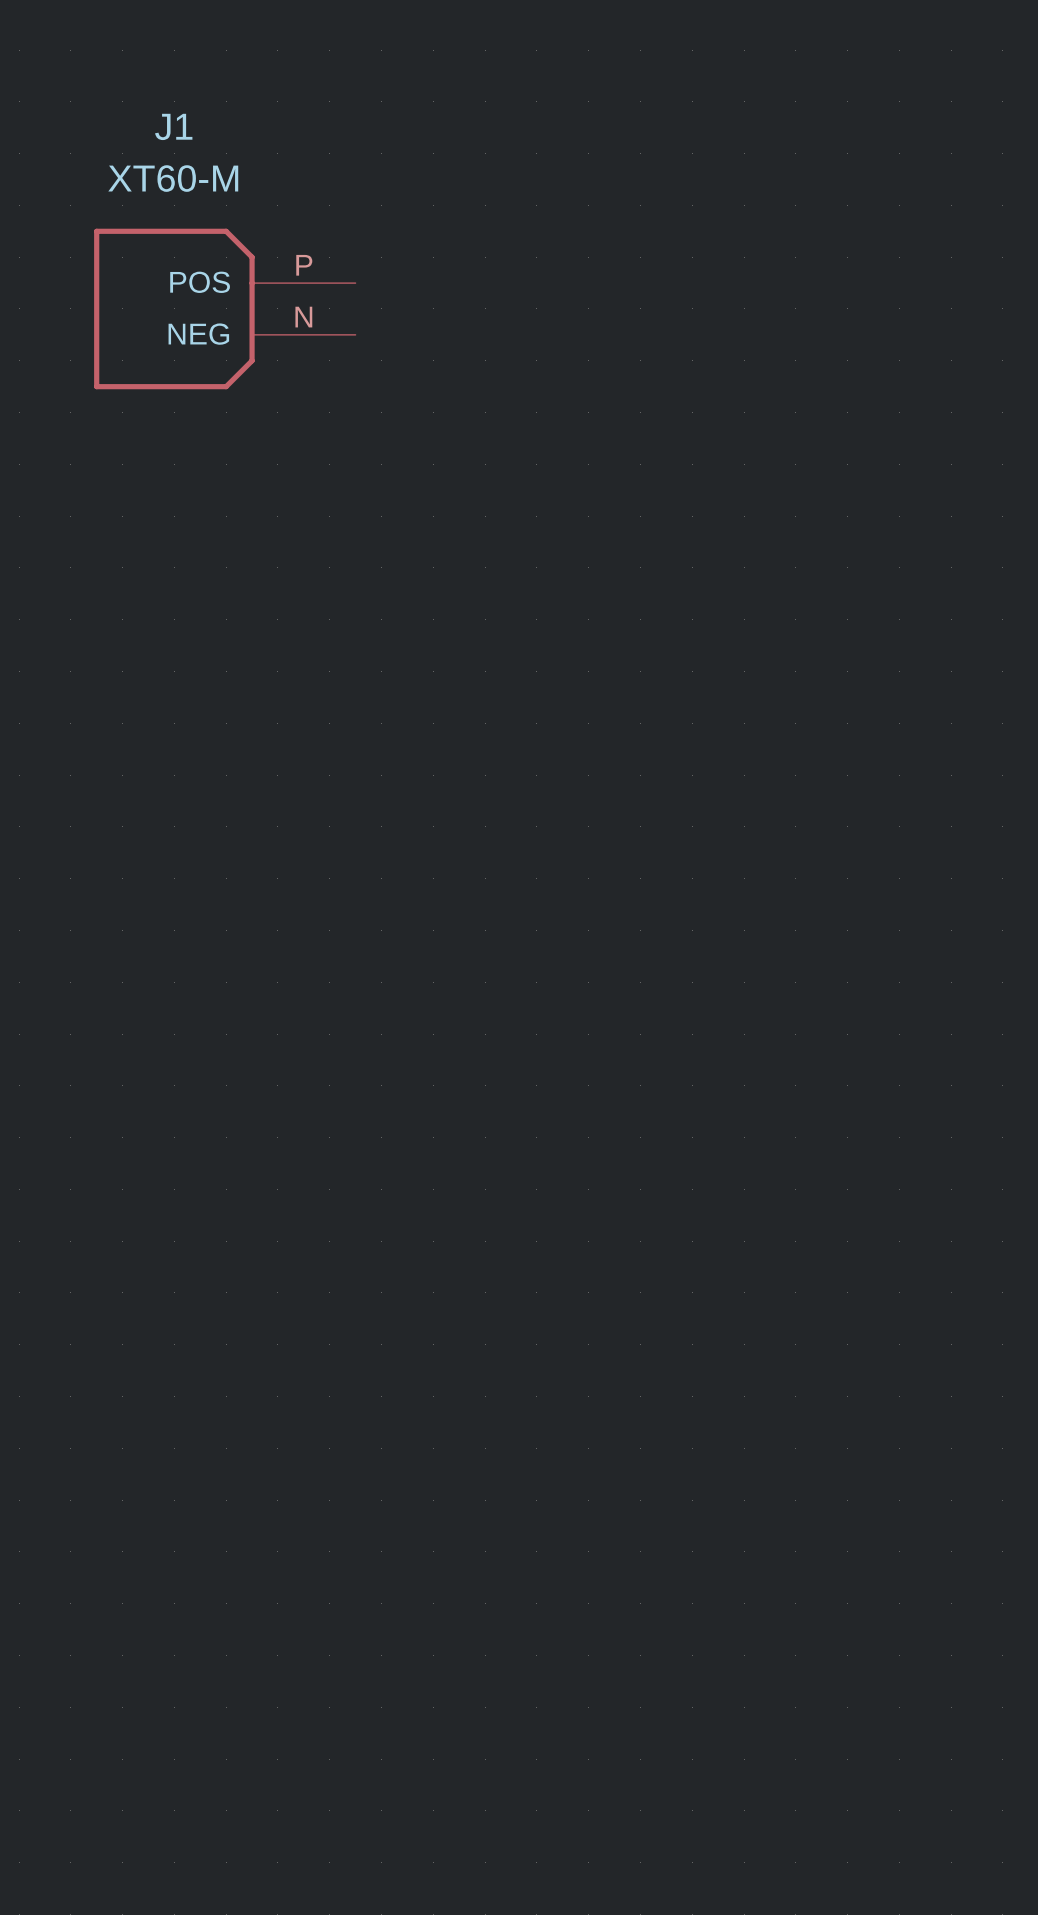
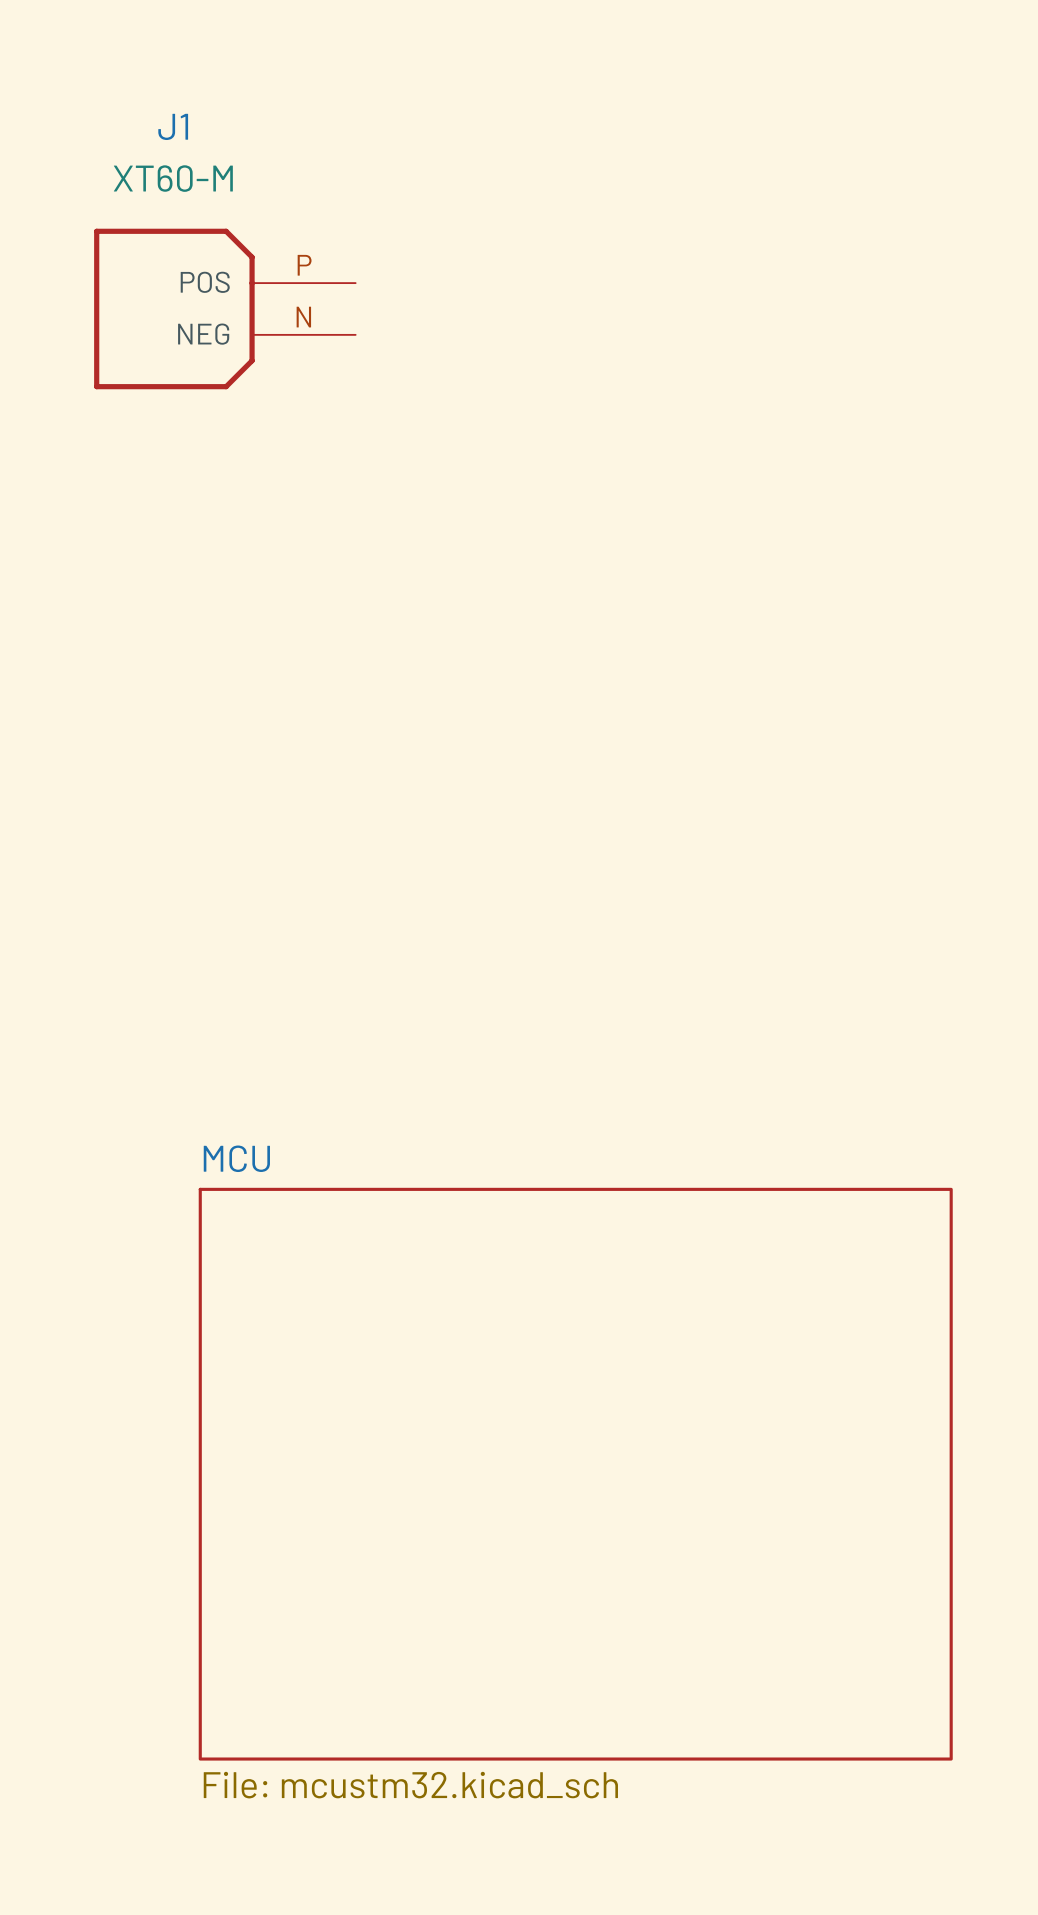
sheet MCU: none -> File: mcustm32.kicad_sch (575, 1474)

